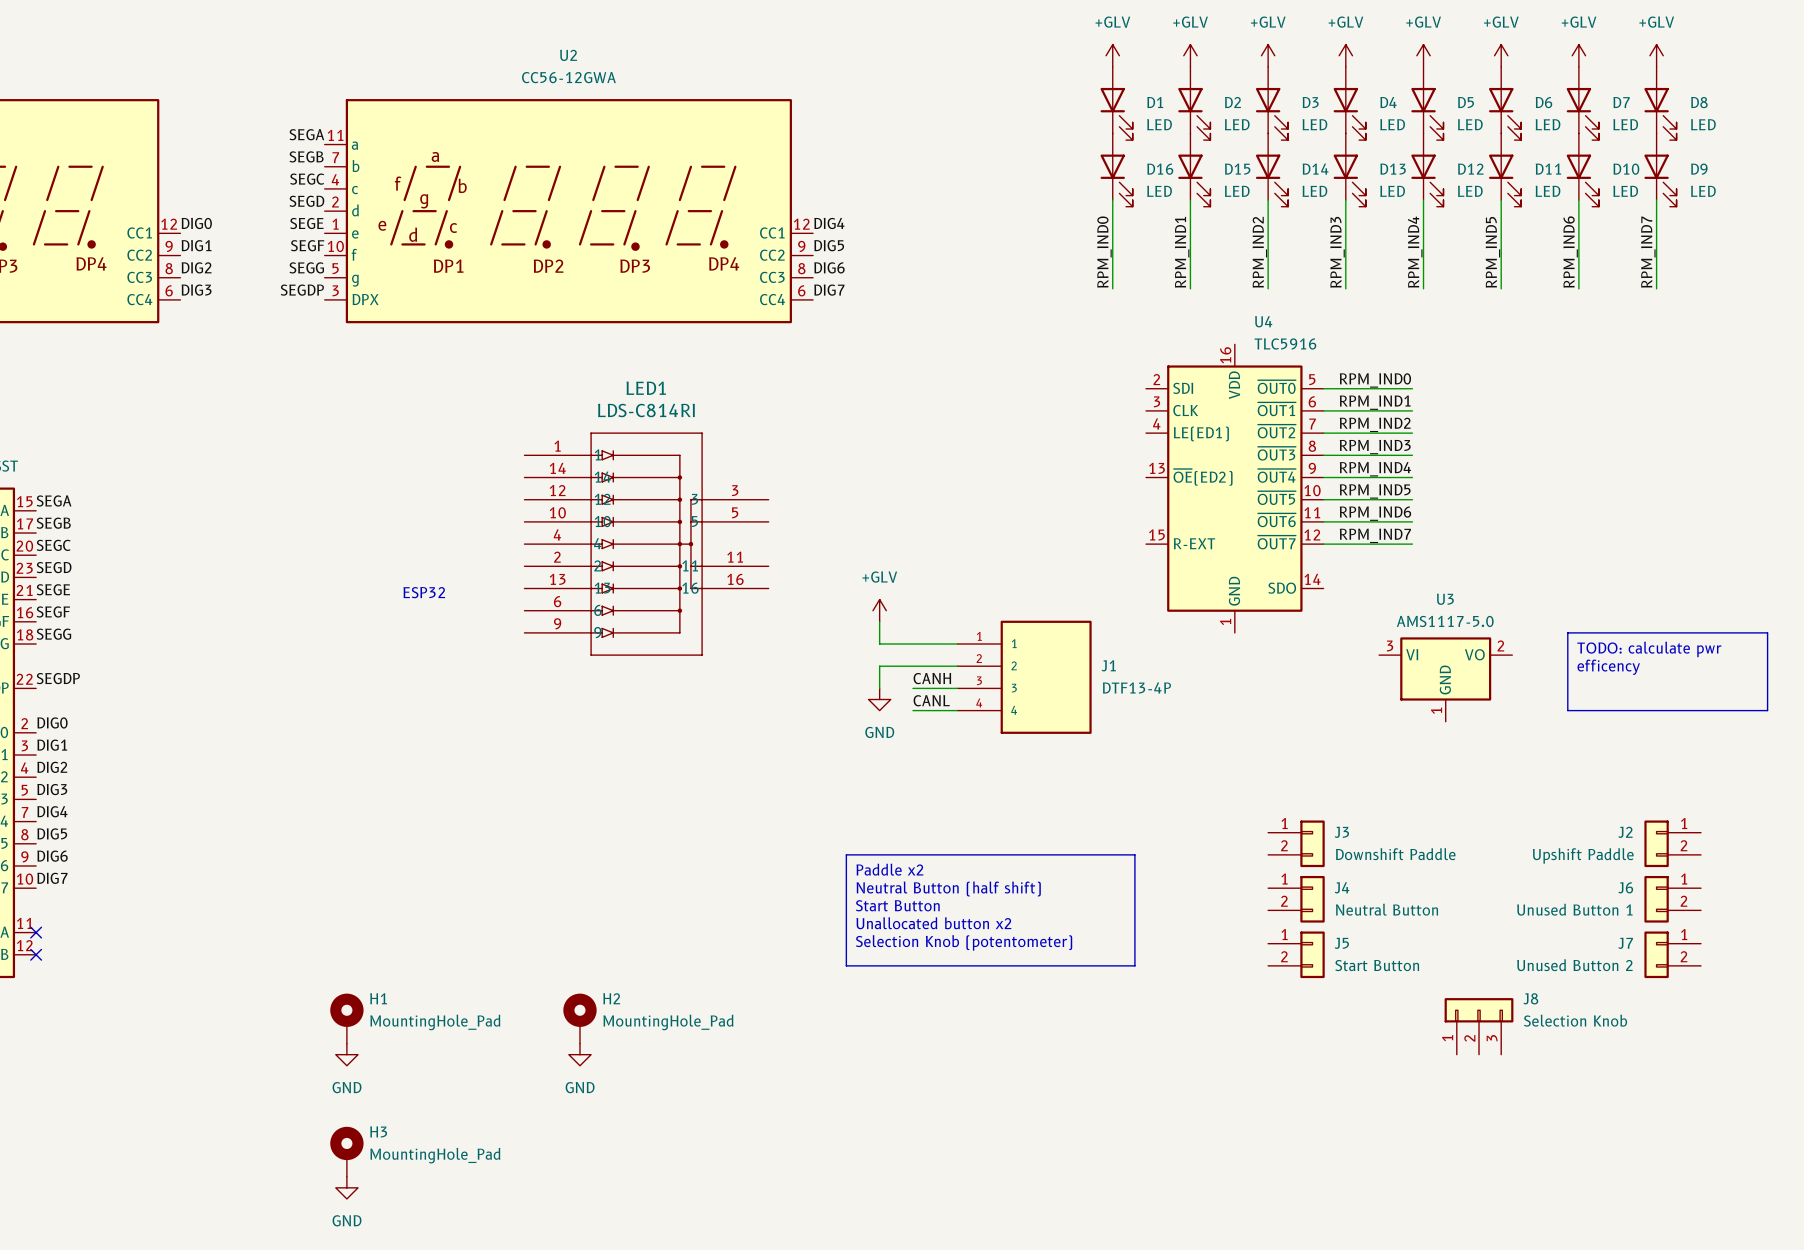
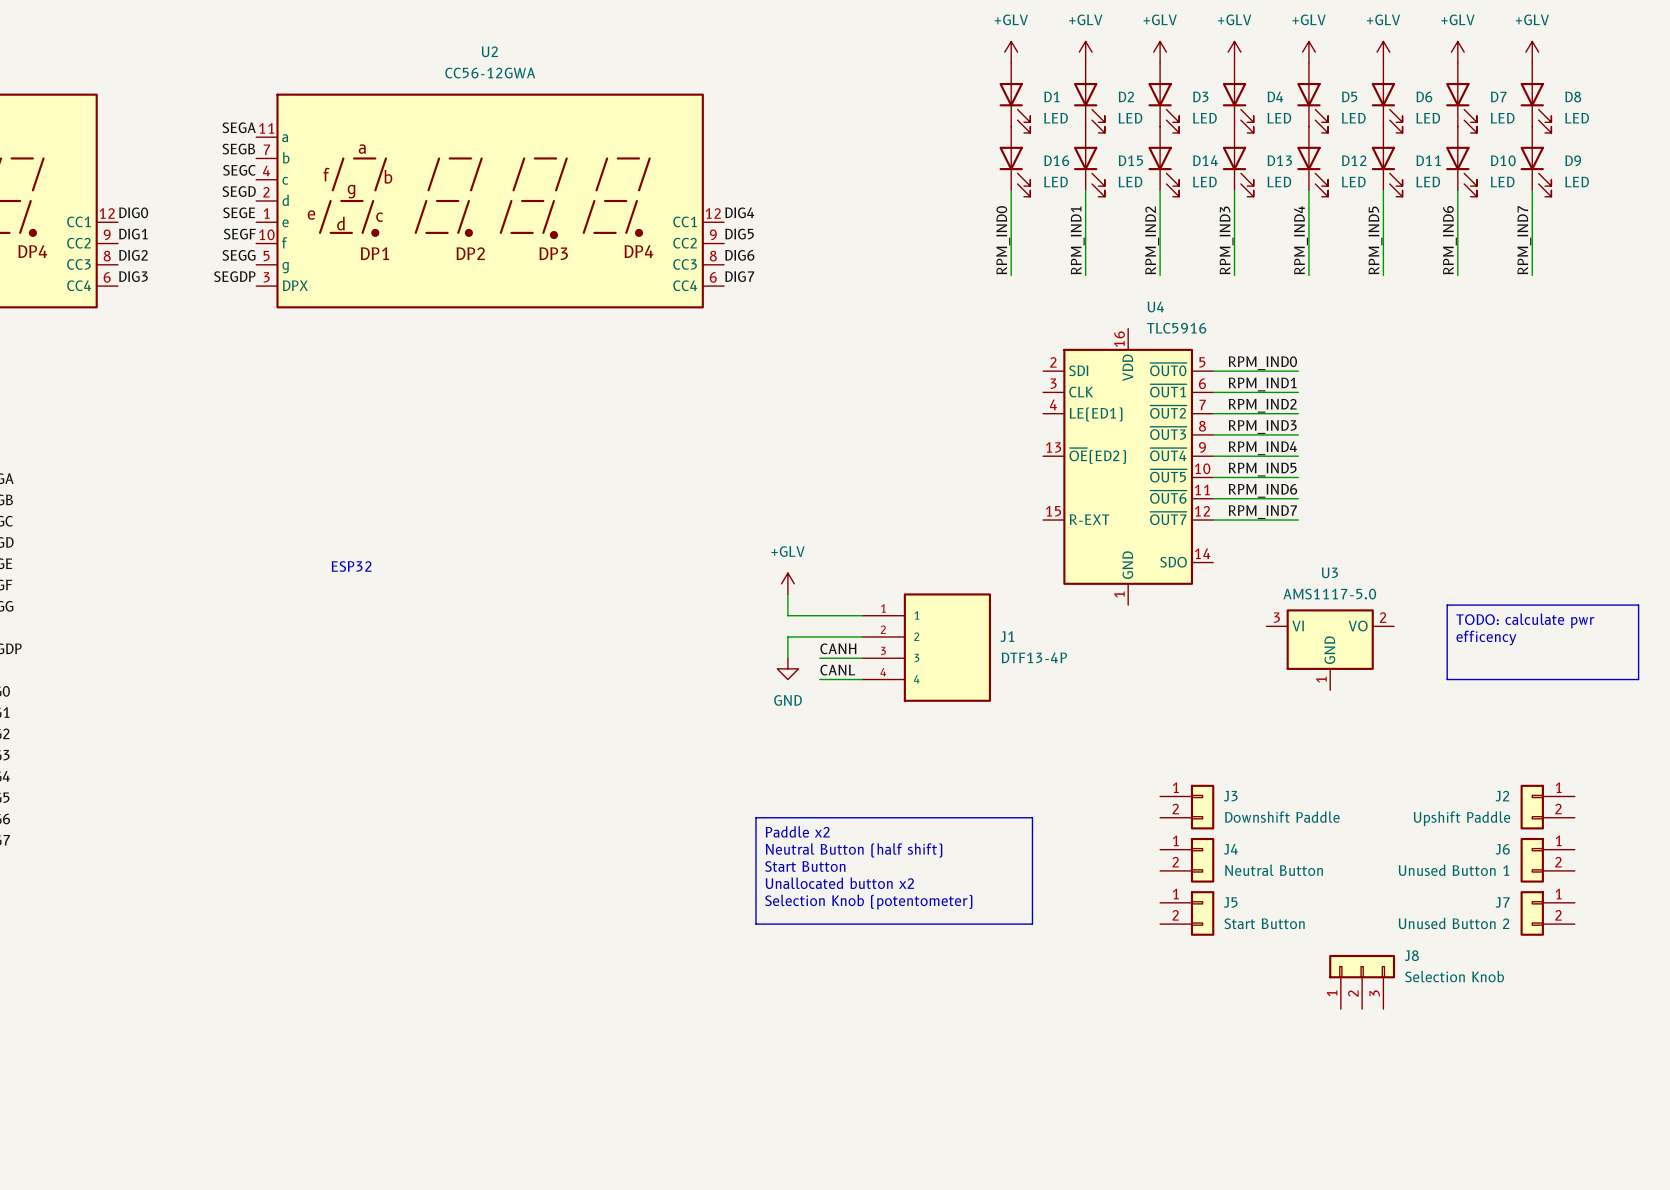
LED1: LDS-C814RI (646, 544) -> none
H1: MountingHole_Pad (346, 1018) -> none
H2: MountingHole_Pad (579, 1018) -> none
power symbol: GND (346, 1054) -> none
power symbol: GND (579, 1054) -> none
H3: MountingHole_Pad (346, 1151) -> none
power symbol: GND (346, 1187) -> none

